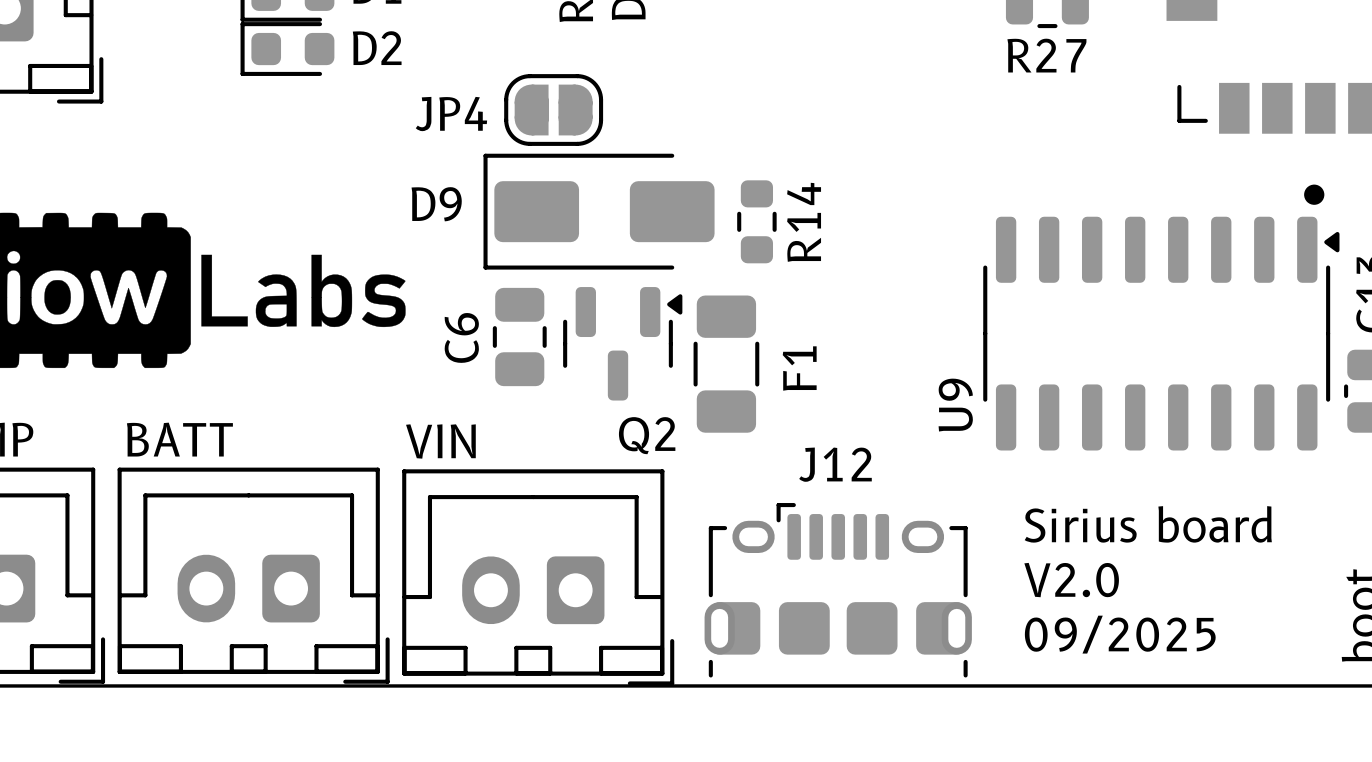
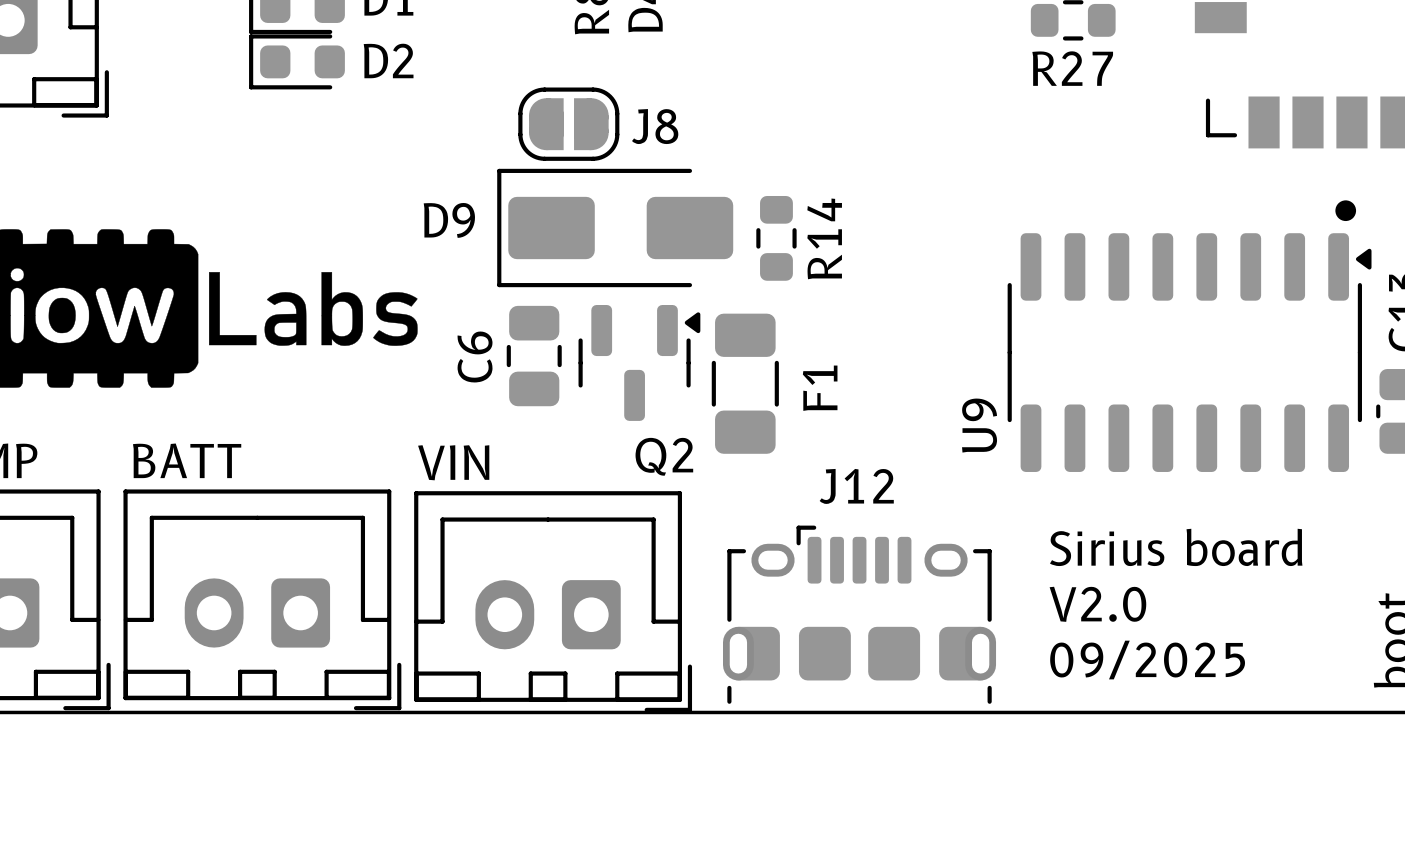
JP4 name: JP4 (451, 114) -> J8 (655, 126)

